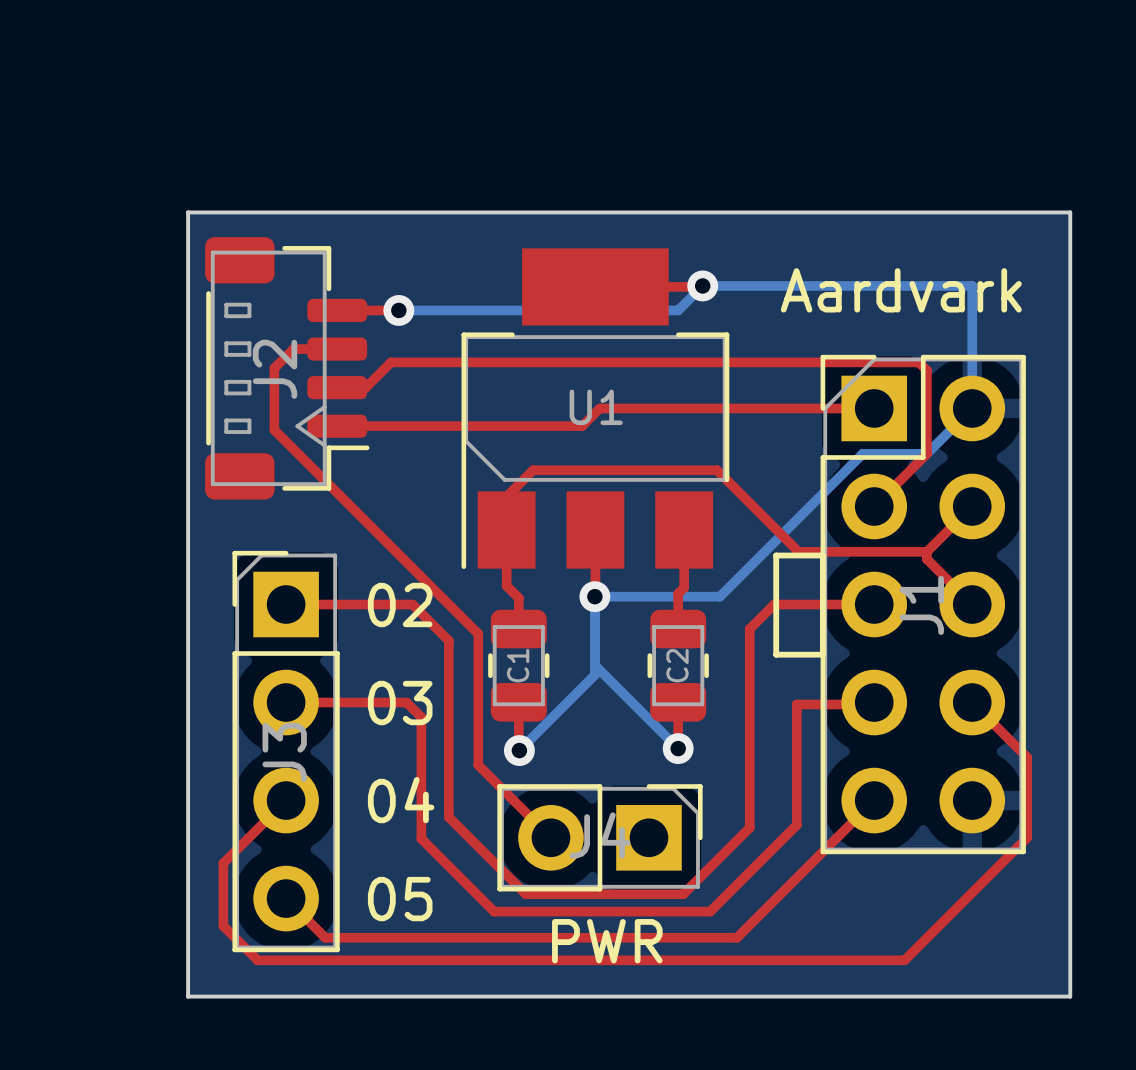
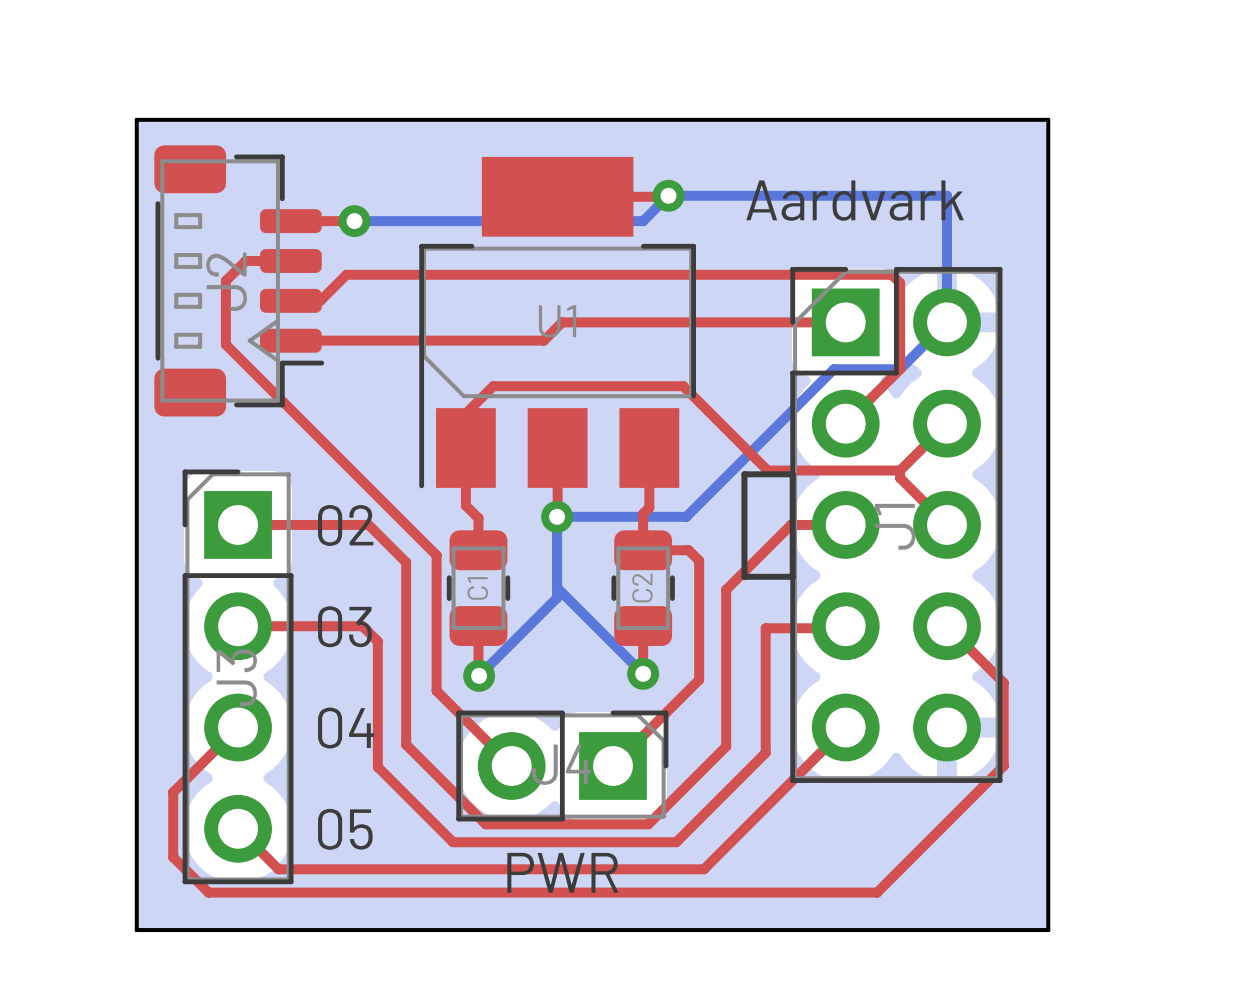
top track: (821, 604) (774, 604) (749, 629) (749, 827) -> (791, 524) (726, 589) (726, 746) (717, 755)
top track: none -> (643, 550) (688, 550) (699, 560) (699, 679) (612, 766)

